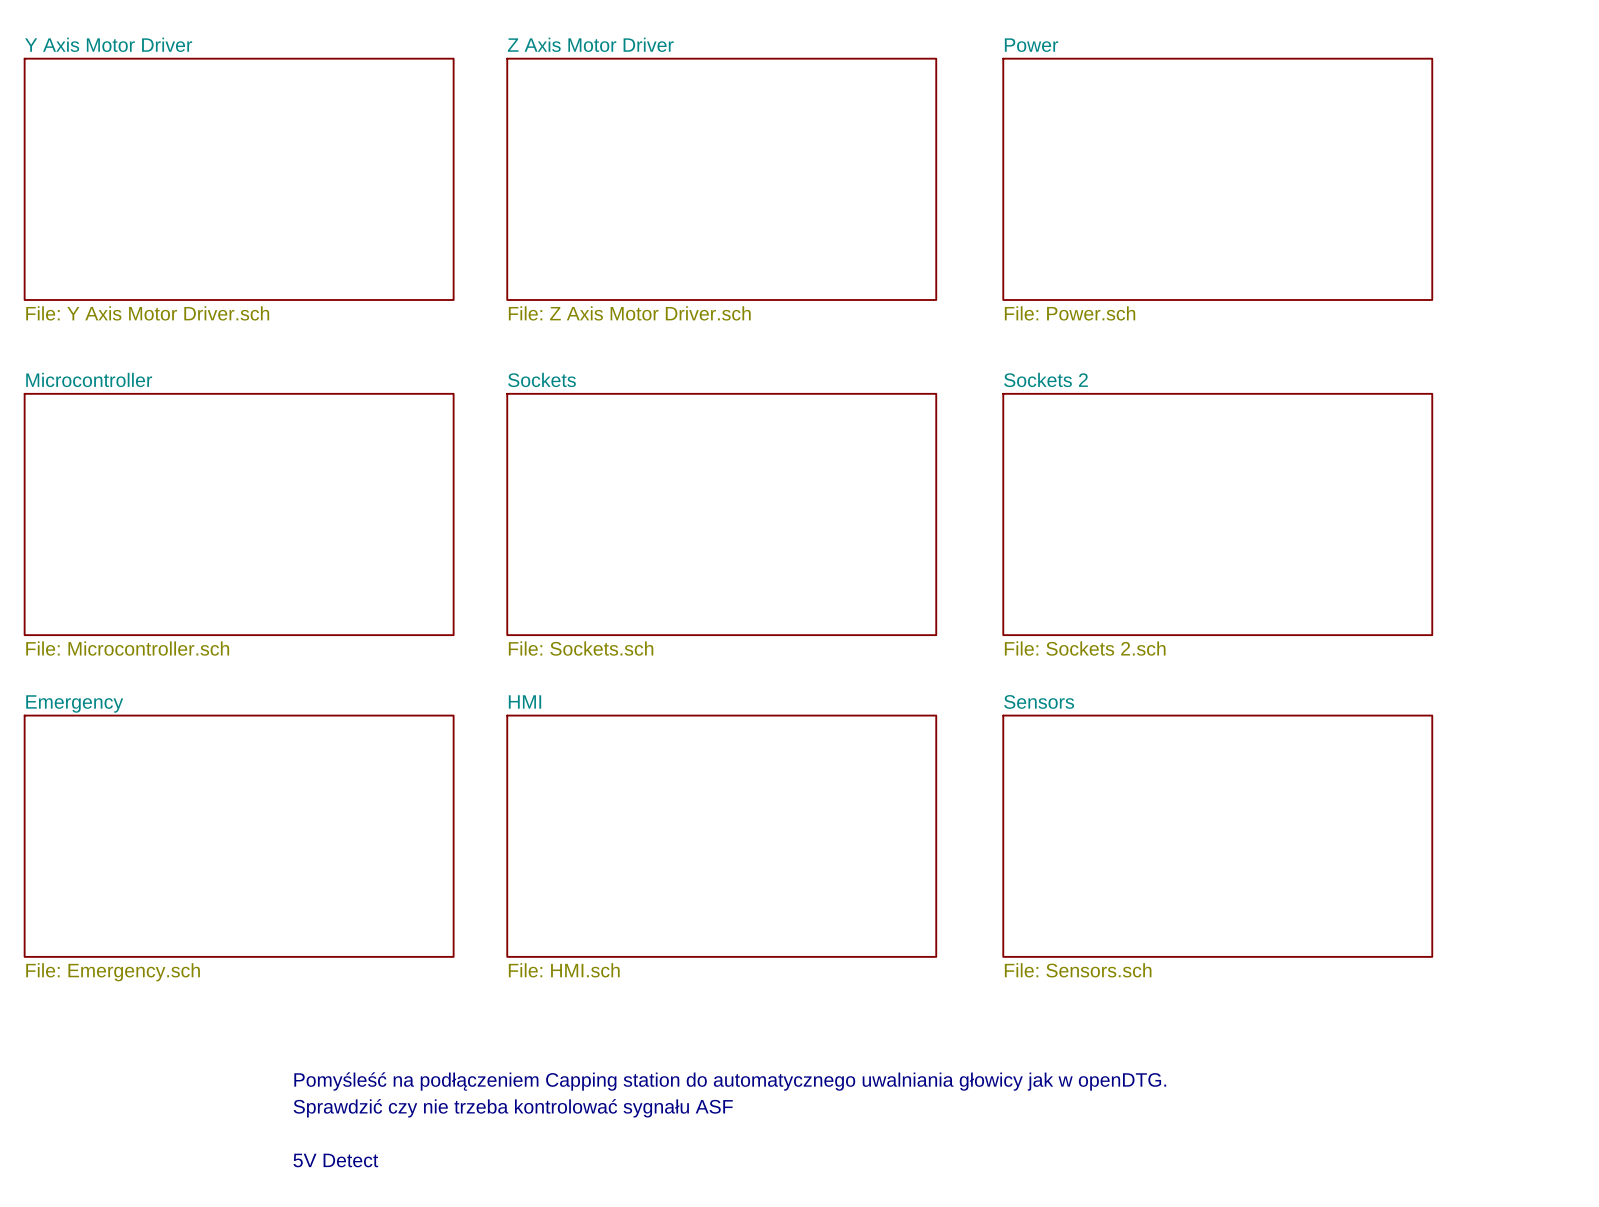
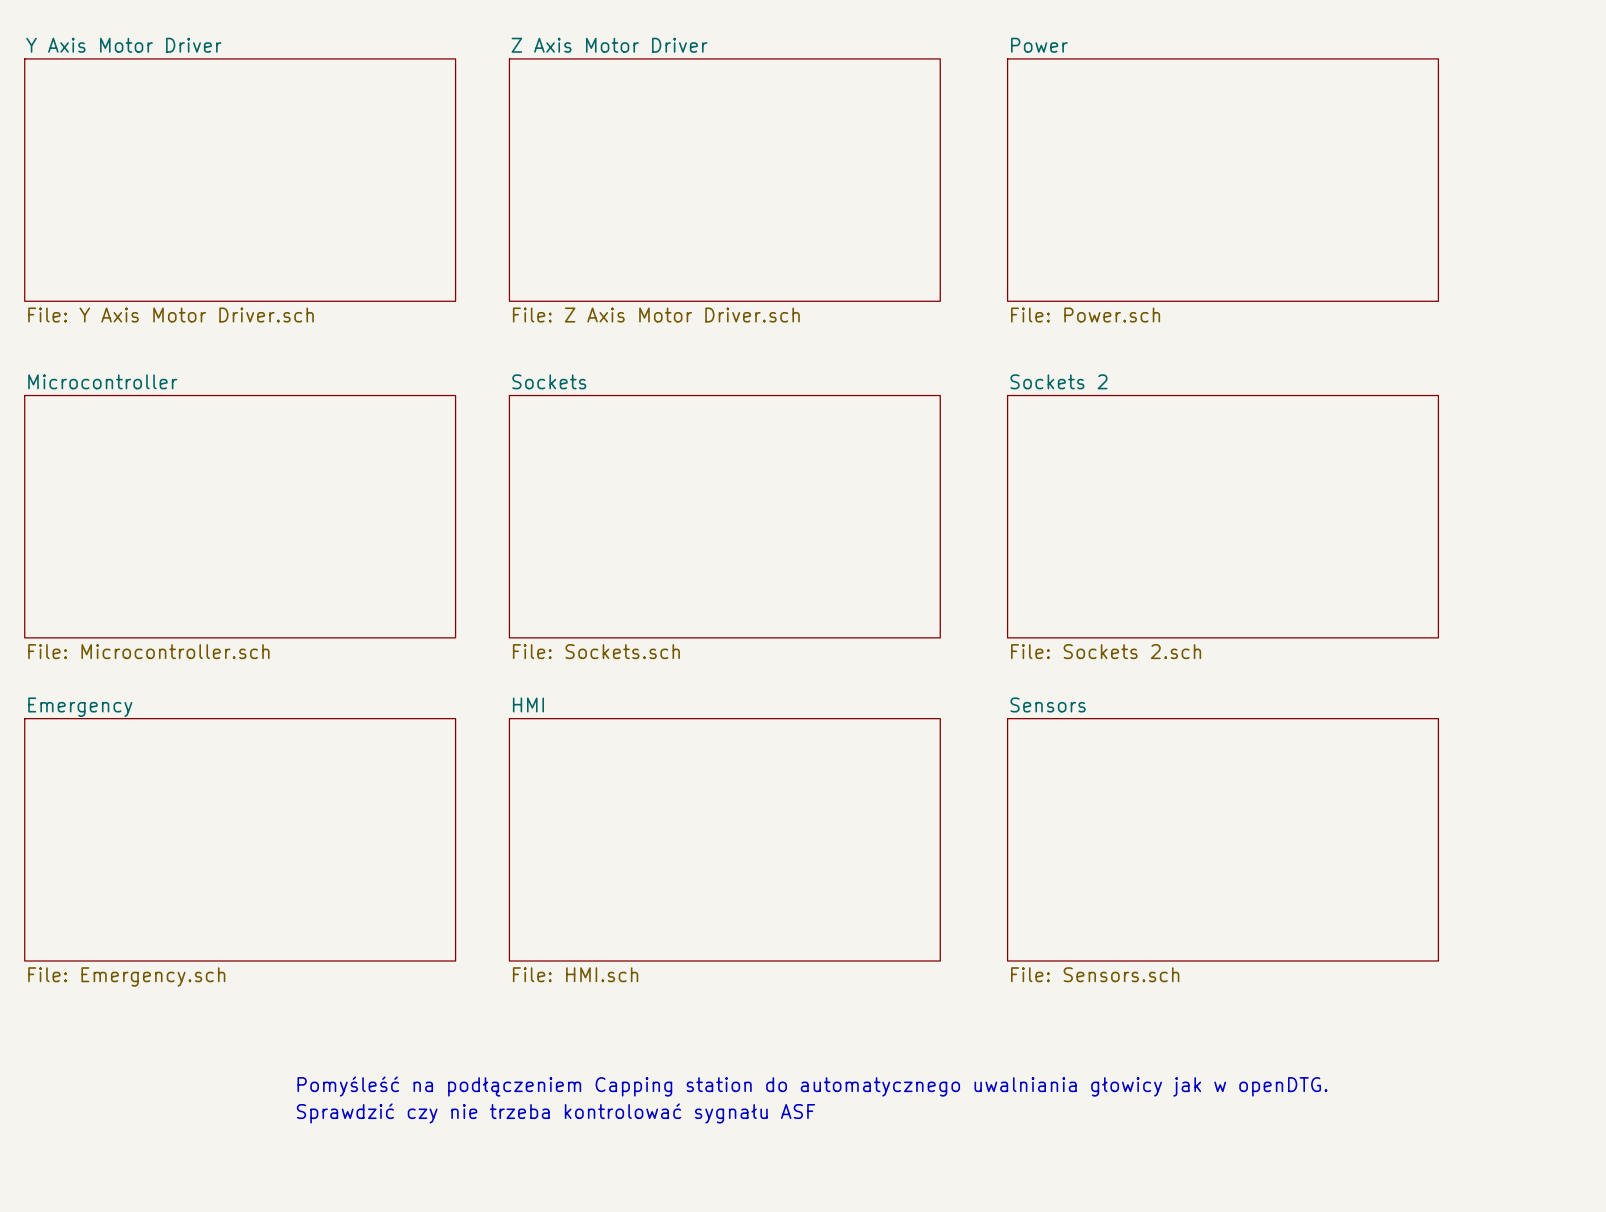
text: 5V Detect (335, 1160) -> none

